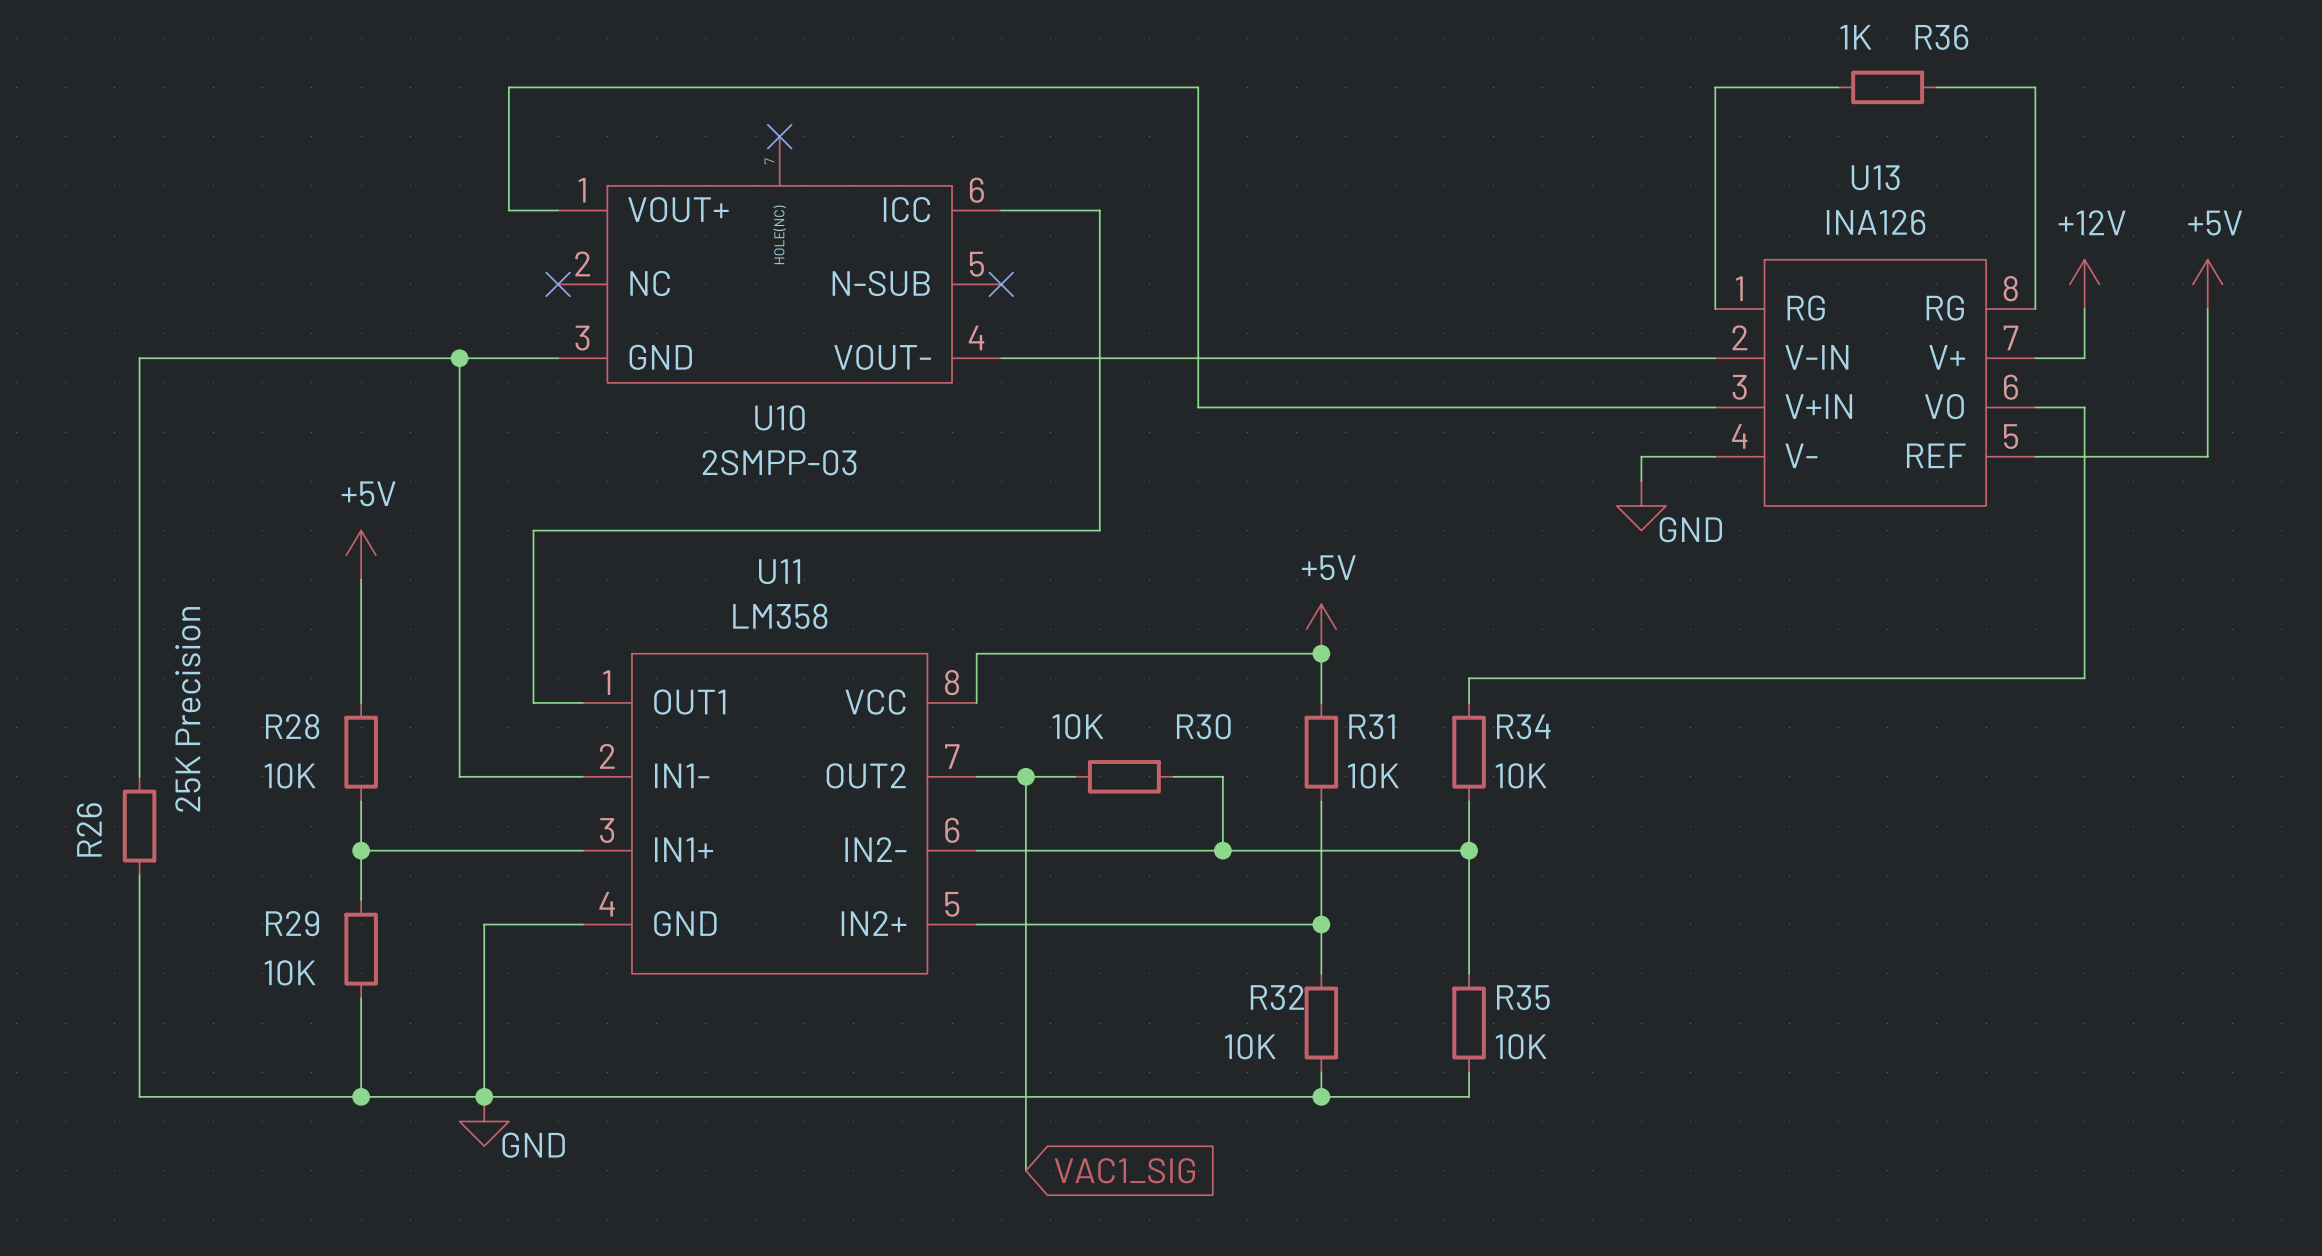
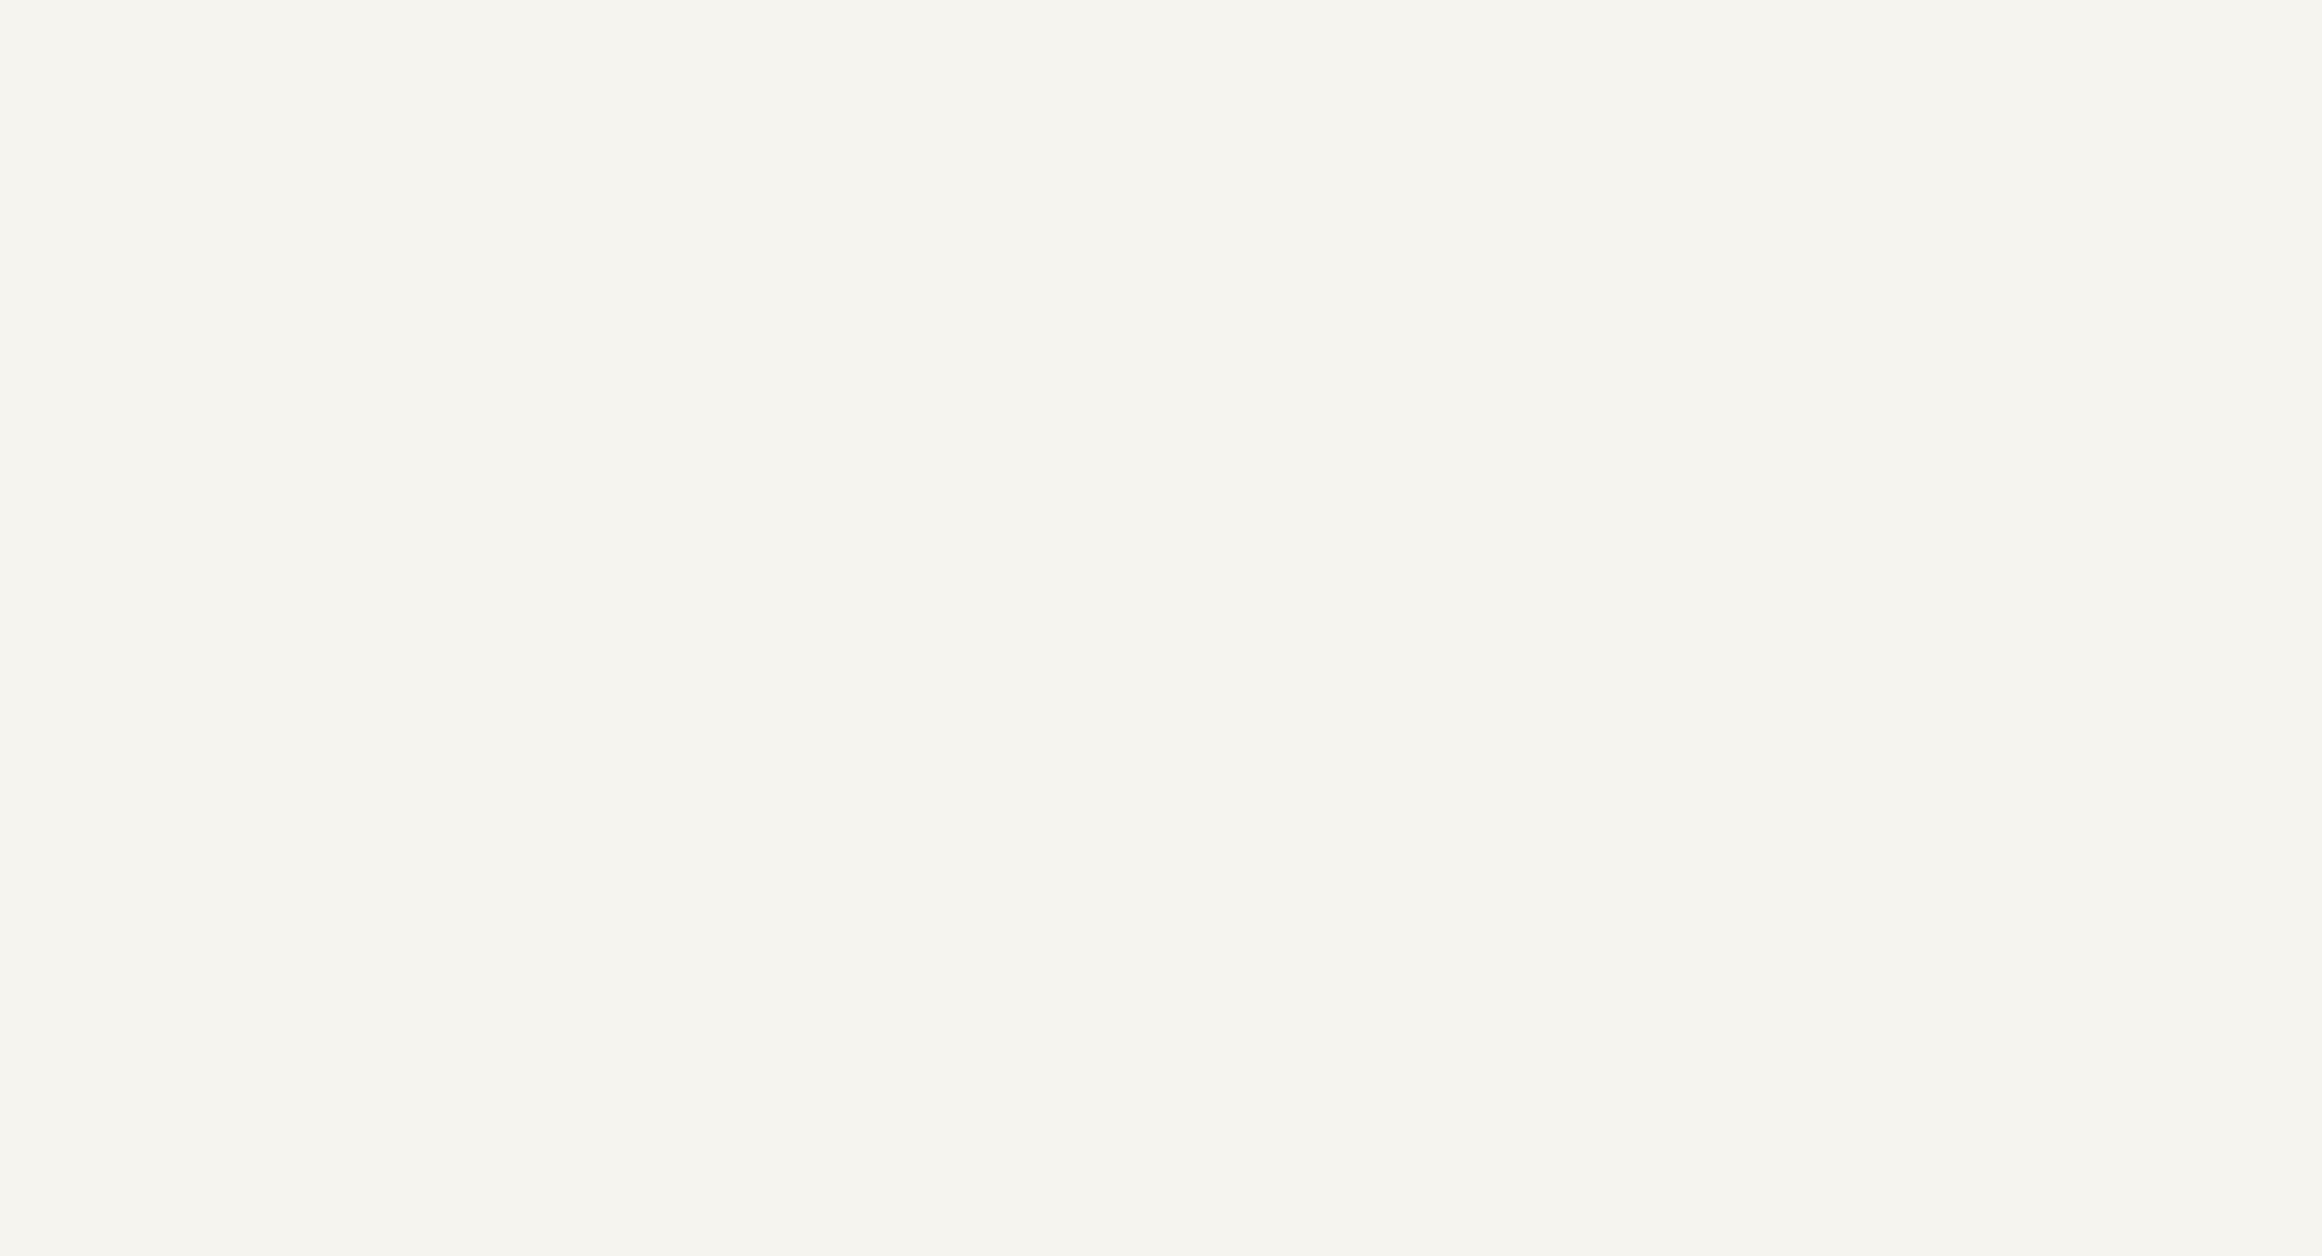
wire: (1838, 87) (1715, 87) (1715, 309) -> none
R36: 1K (1887, 87) -> none
wire: (1936, 87) (2035, 87) (2035, 309) -> none
no-connect mark: (779, 136) -> none
wire: (558, 210) (508, 210) (508, 87) (1198, 87) (1198, 407) (1715, 407) -> none
wire: (1001, 210) (1099, 210) (1099, 530) (533, 530) (533, 702) (582, 702) -> none
U10: 2SMPP-03 (779, 259) -> none
no-connect mark: (558, 284) -> none
no-connect mark: (1001, 284) -> none
power symbol: +12V (2084, 284) -> none
power symbol: +5V (2207, 284) -> none
wire: (2084, 309) (2084, 358) (2035, 358) -> none
wire: (2207, 309) (2207, 456) (2035, 456) -> none
wire: (459, 358) (459, 776) (582, 776) -> none
junction: (459, 358) -> none
wire: (558, 358) (139, 358) (139, 776) -> none
wire: (1001, 358) (1715, 358) -> none
U13: INA126 (1875, 382) -> none
wire: (2035, 407) (2084, 407) (2084, 678) (1469, 678) (1469, 702) -> none
wire: (1715, 456) (1641, 456) (1641, 481) -> none
power symbol: GND (1641, 505) -> none
power symbol: +5V (361, 555) -> none
wire: (361, 579) (361, 702) -> none
power symbol: +5V (1321, 629) -> none
junction: (1321, 653) -> none
wire: (976, 702) (976, 653) (1321, 653) (1321, 702) -> none
R28: 10K (361, 752) -> none
R31: 10K (1321, 752) -> none
R34: 10K (1469, 752) -> none
wire: (976, 776) (1075, 776) -> none
wire: (1025, 776) (1025, 1170) -> none
junction: (1025, 776) -> none
R30: 10K (1124, 776) -> none
wire: (1173, 776) (1222, 776) (1222, 850) -> none
wire: (361, 801) (361, 899) -> none
wire: (1321, 801) (1321, 973) -> none
wire: (1469, 801) (1469, 973) -> none
U11: LM358 (779, 813) -> none
R26: 25K Precision (139, 826) -> none
wire: (361, 850) (582, 850) -> none
junction: (361, 850) -> none
wire: (976, 850) (1469, 850) -> none
junction: (1222, 850) -> none
junction: (1469, 850) -> none
wire: (139, 875) (139, 1096) (1469, 1096) (1469, 1072) -> none
wire: (582, 924) (484, 924) (484, 1096) -> none
wire: (976, 924) (1321, 924) -> none
junction: (1321, 924) -> none
R29: 10K (361, 949) -> none
wire: (361, 998) (361, 1096) -> none
R32: 10K (1321, 1023) -> none
R35: 10K (1469, 1023) -> none
wire: (1321, 1072) (1321, 1096) -> none
junction: (361, 1096) -> none
junction: (484, 1096) -> none
junction: (1321, 1096) -> none
power symbol: GND (484, 1121) -> none
global label: VAC1_SIG (1124, 1170) -> none

